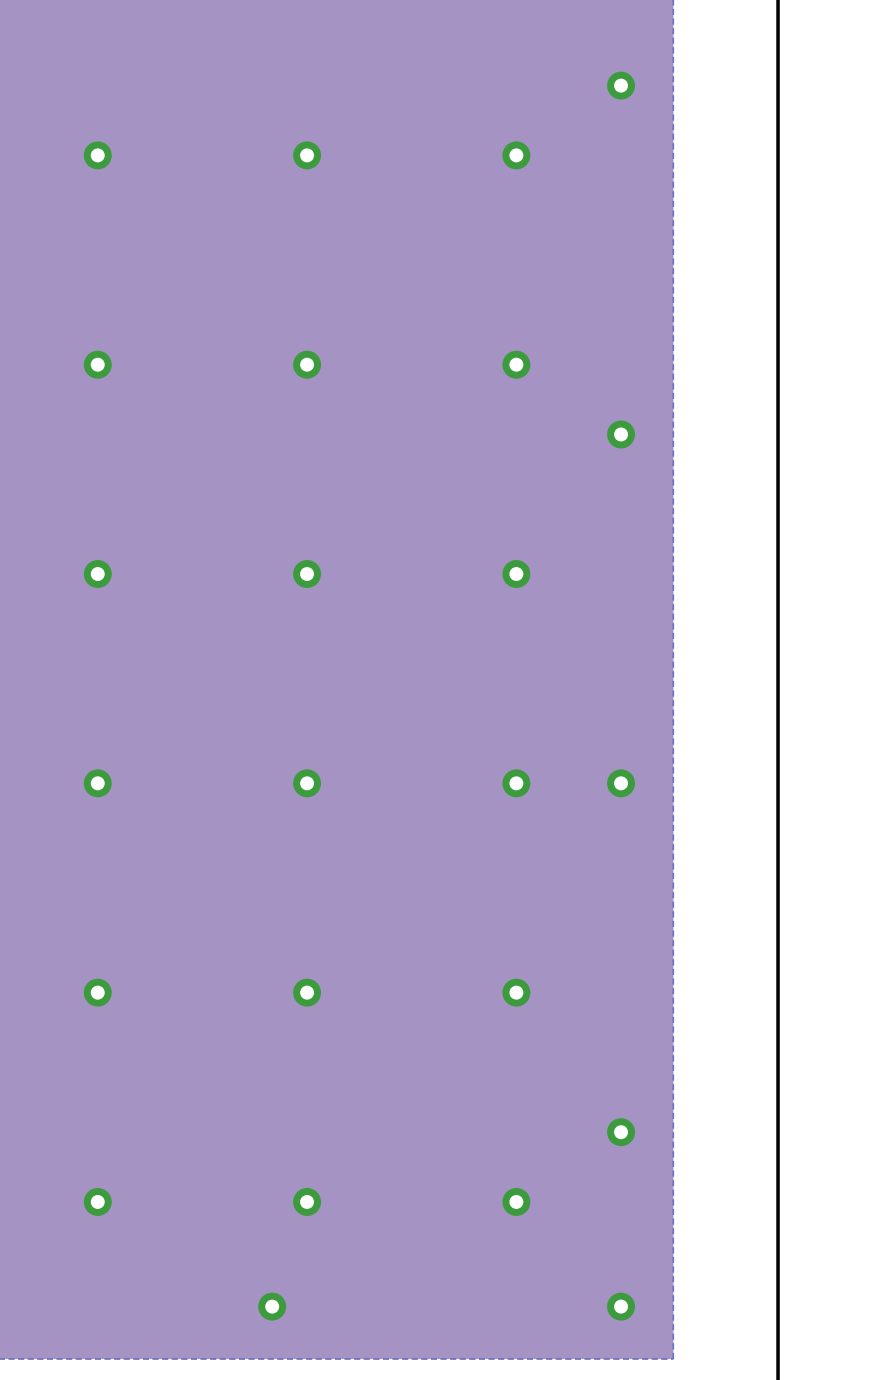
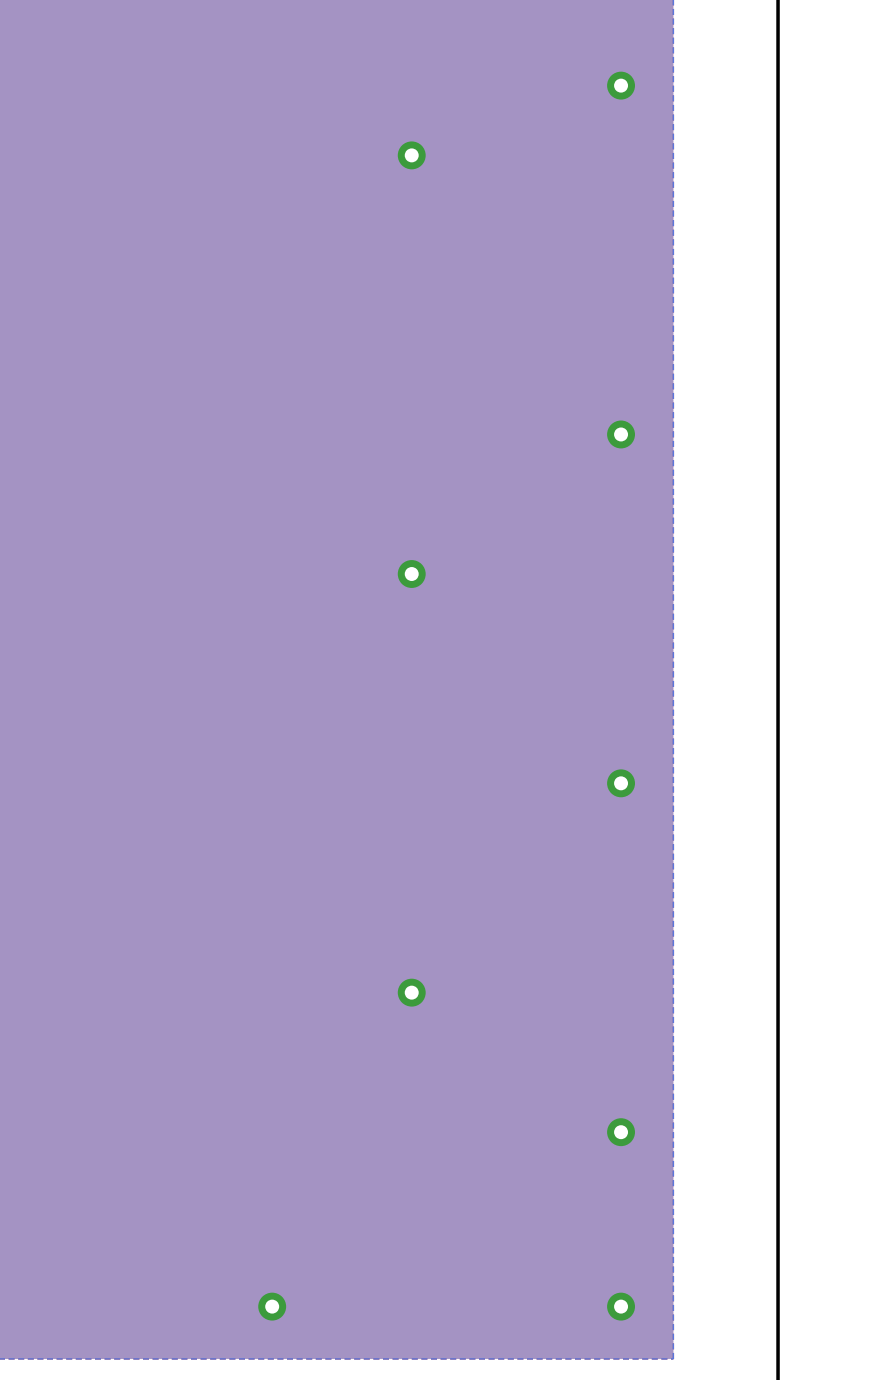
via: (97, 155) -> none
via: (307, 155) -> none
via: none -> (411, 155)
via: (516, 155) -> none
via: (97, 364) -> none
via: (307, 364) -> none
via: (516, 364) -> none
via: (97, 574) -> none
via: (307, 574) -> none
via: none -> (411, 574)
via: (516, 574) -> none
via: (97, 783) -> none
via: (307, 783) -> none
via: (516, 783) -> none
via: (97, 992) -> none
via: (307, 992) -> none
via: none -> (411, 992)
via: (516, 992) -> none
via: (97, 1201) -> none
via: (307, 1201) -> none
via: (516, 1201) -> none

